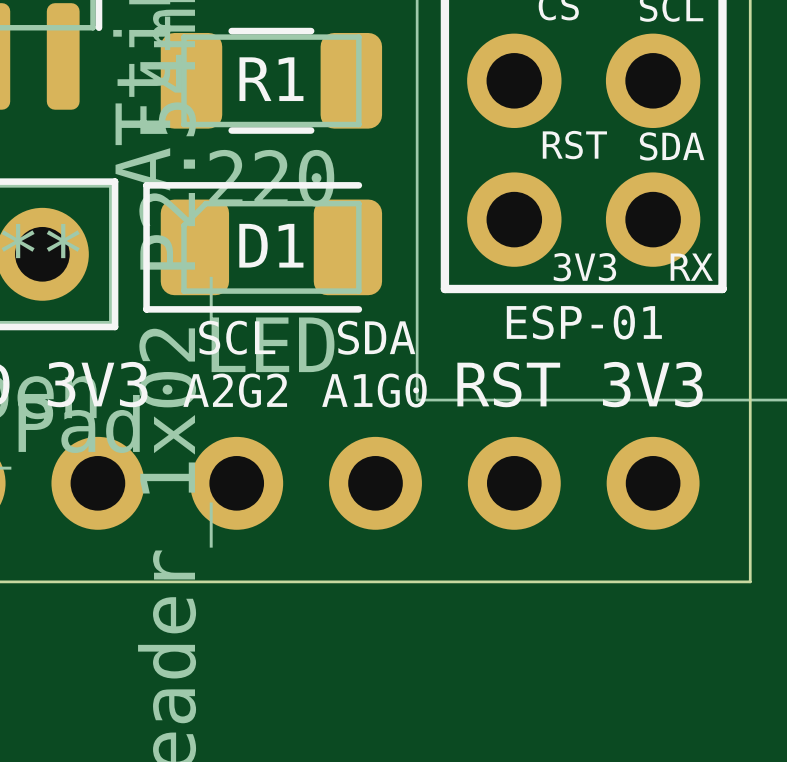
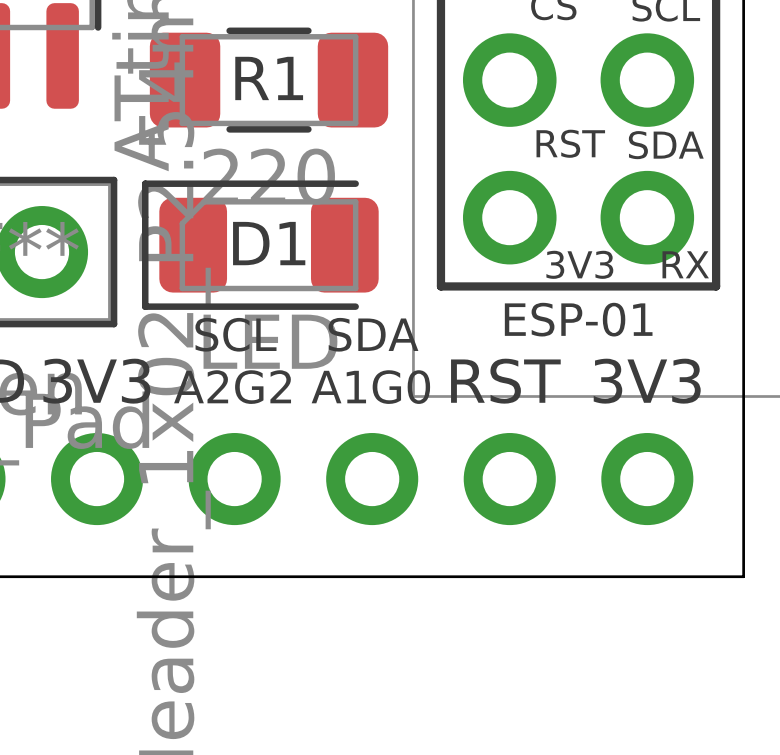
R1 footprint: [160, 27, 383, 134] -> [149, 27, 389, 133]

